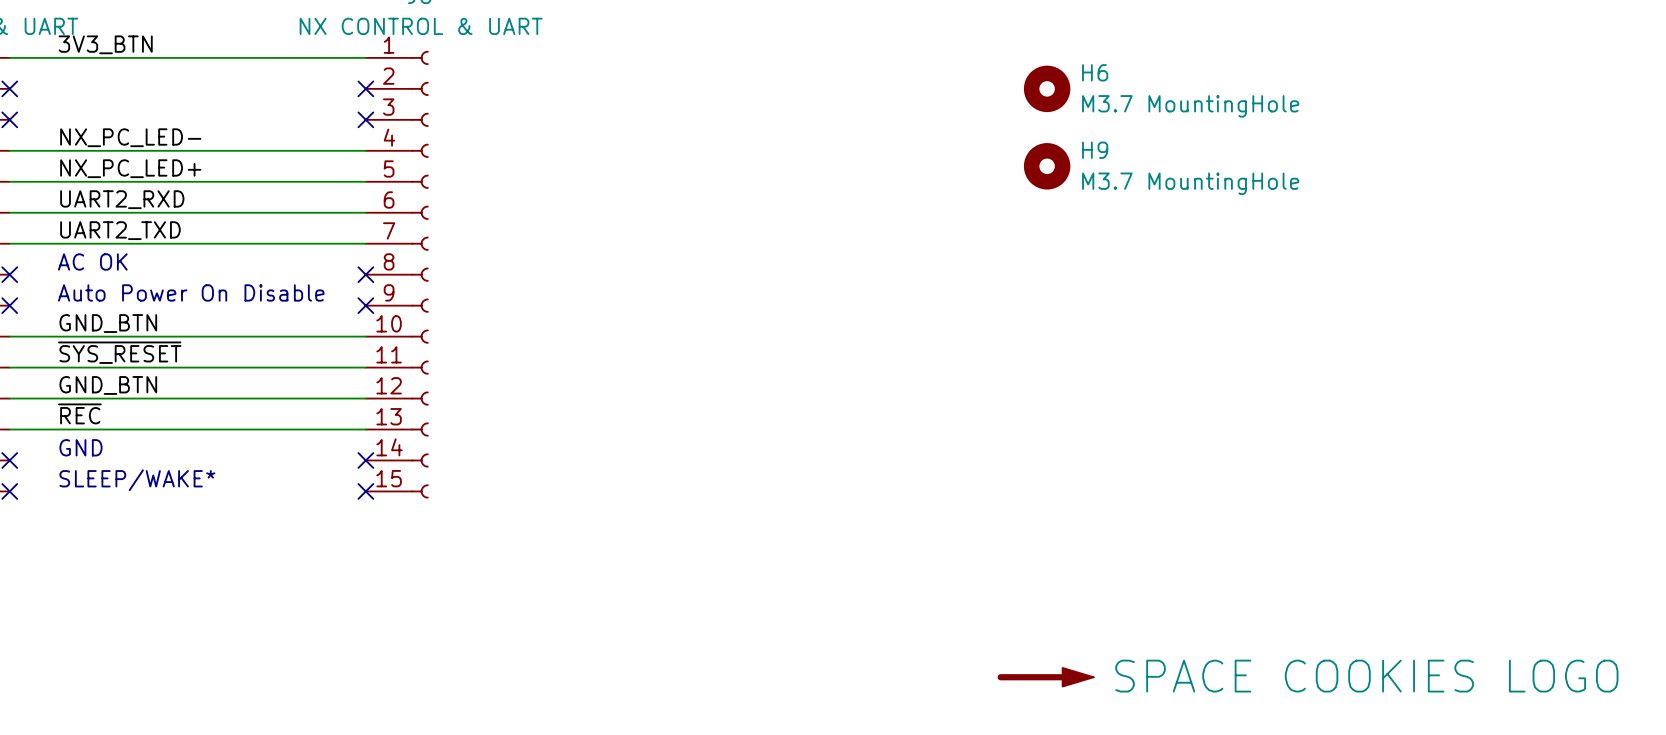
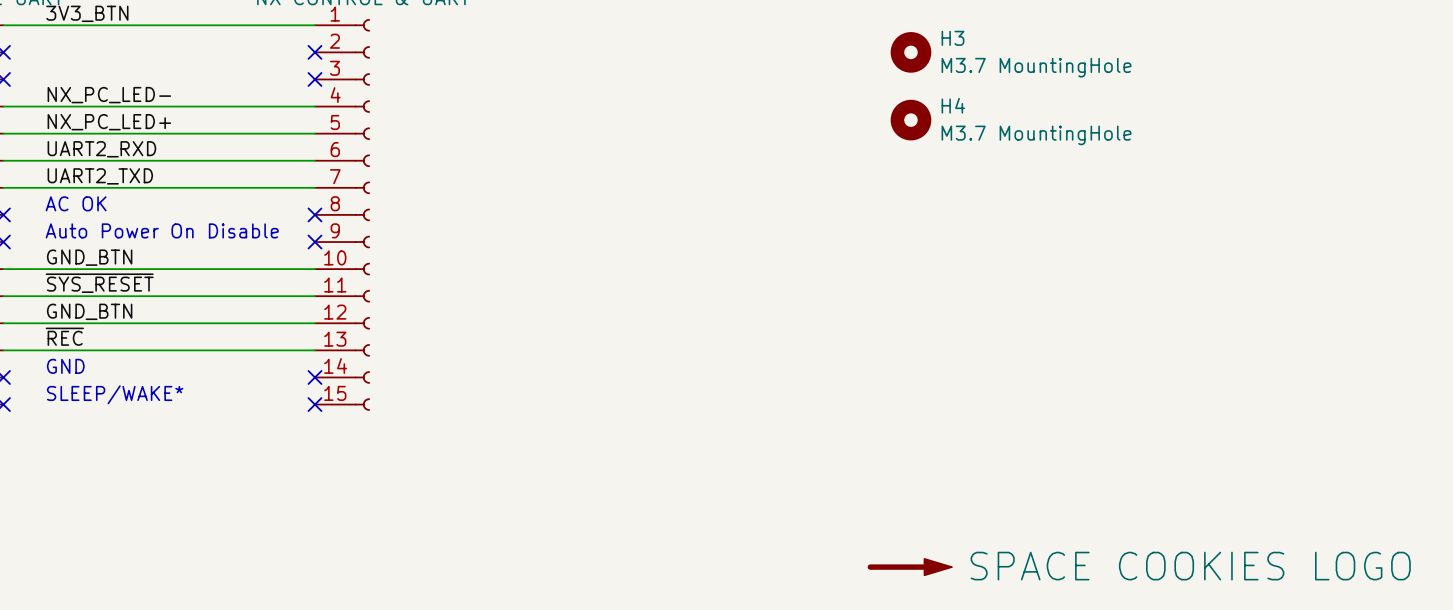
H6 name: H6 (1095, 72) -> H3 (953, 38)
H9 name: H9 (1095, 150) -> H4 (953, 105)

